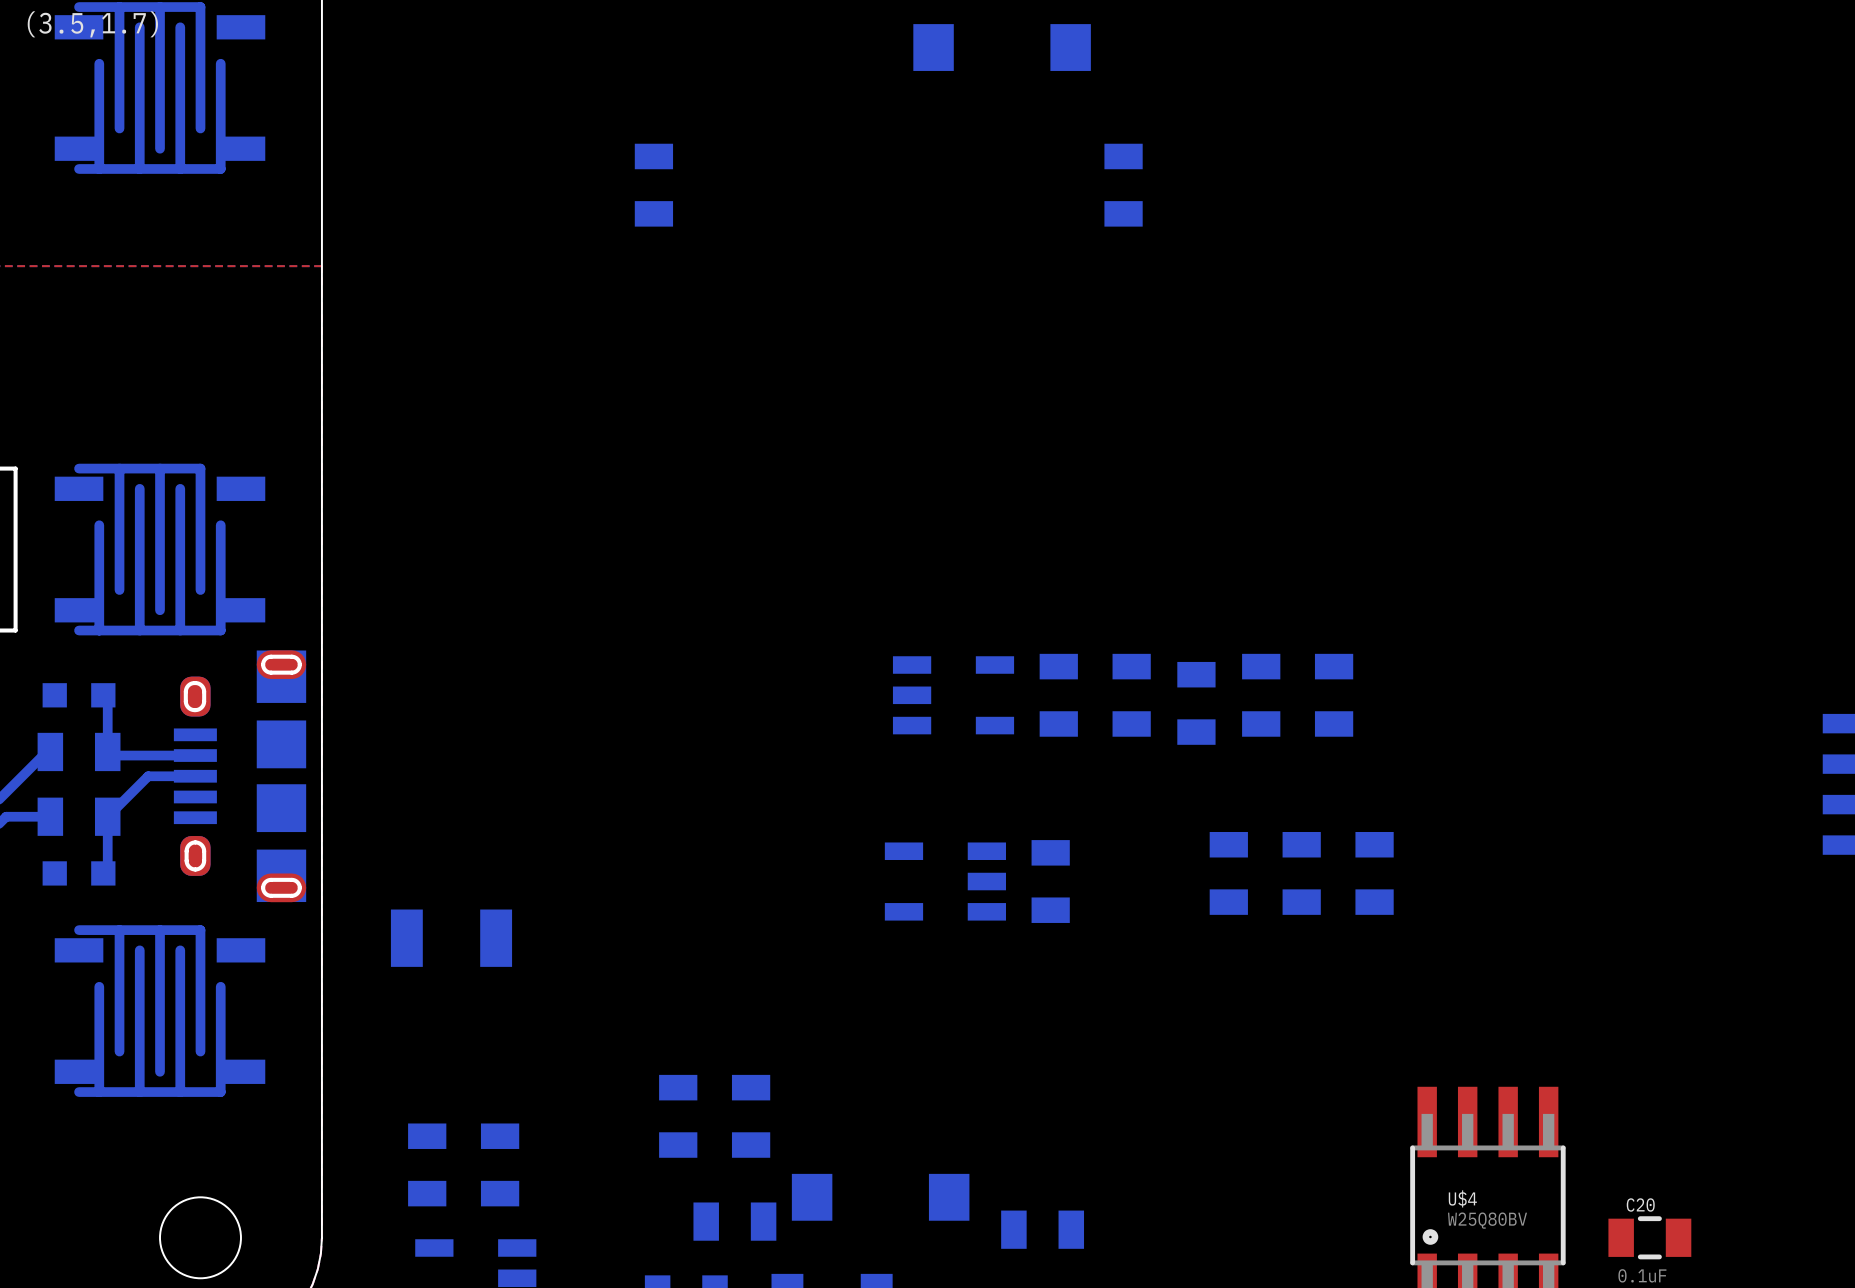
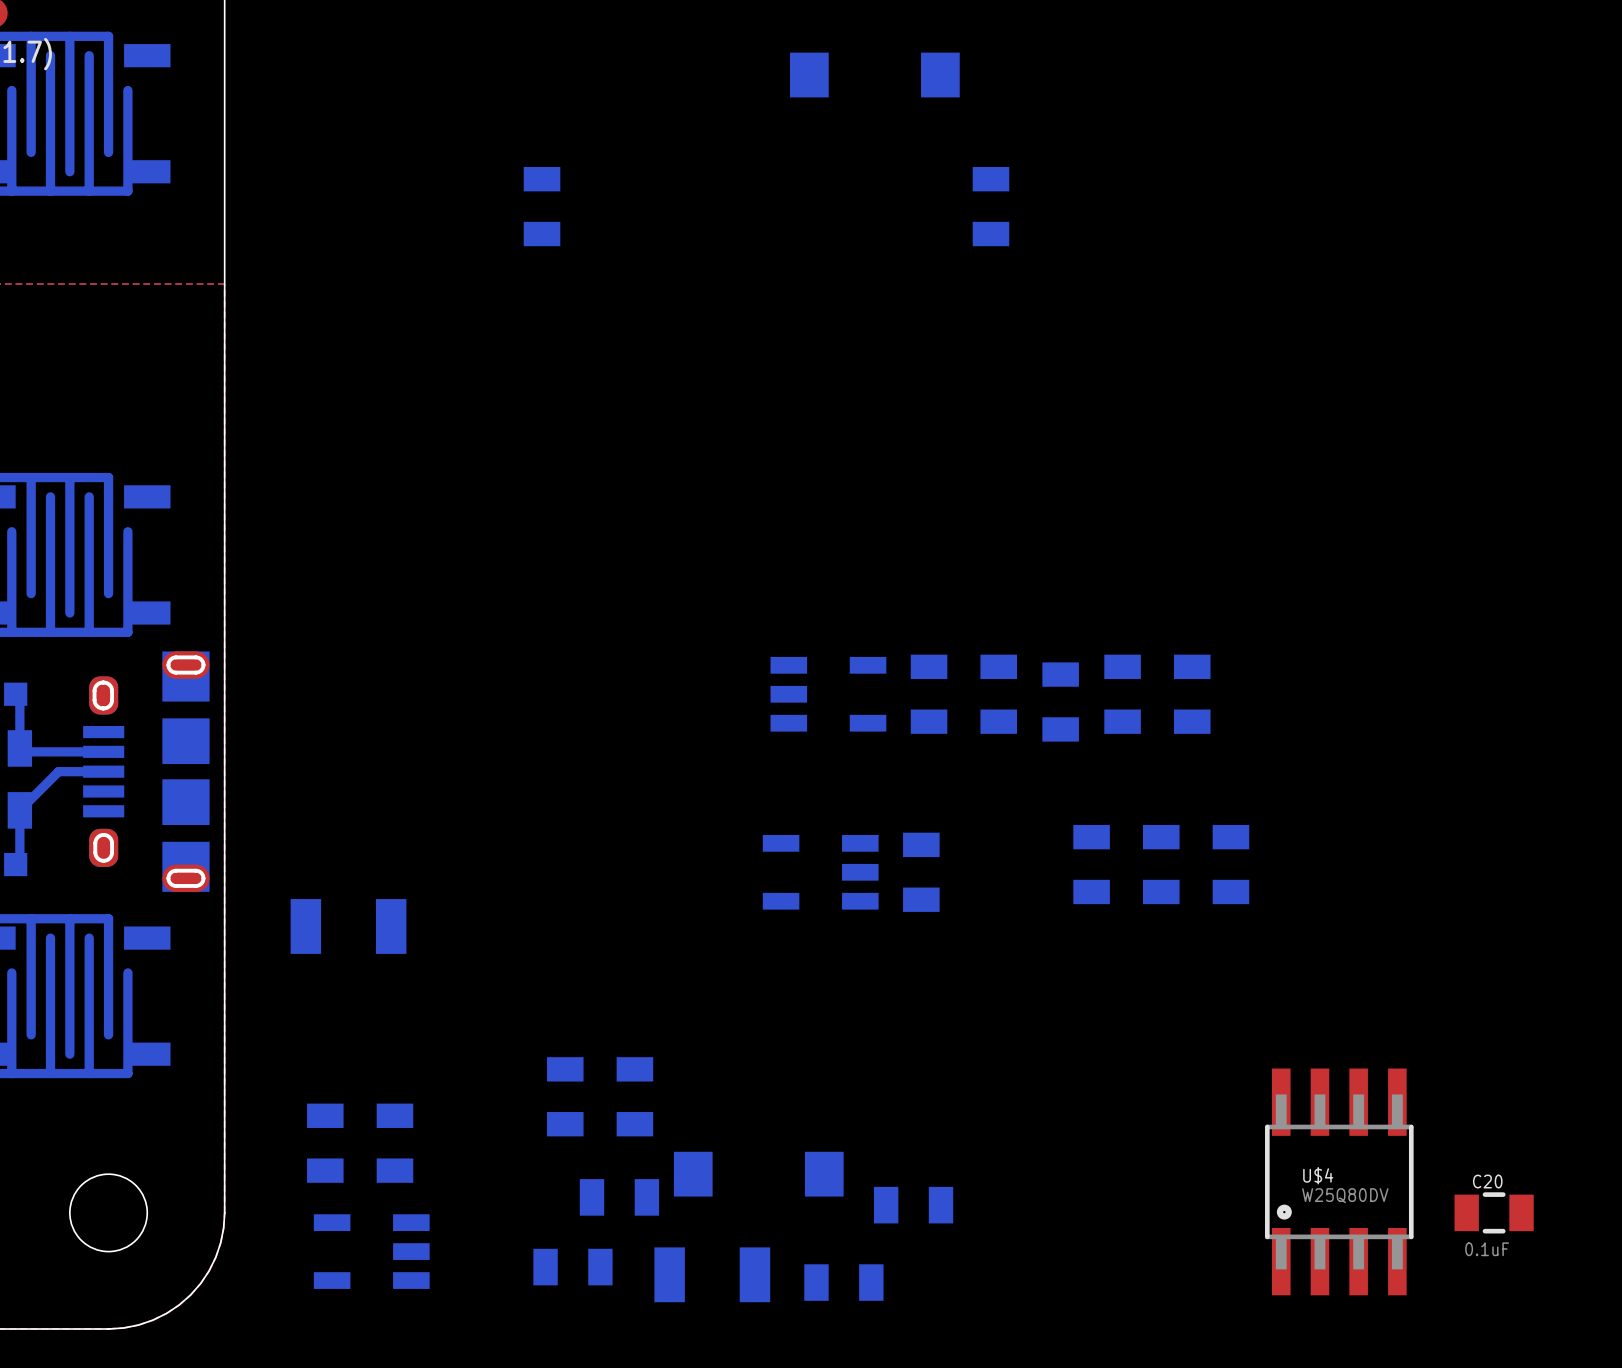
U$4 value: W25Q80BV (1487, 1220) -> W25Q80DV (1345, 1195)

